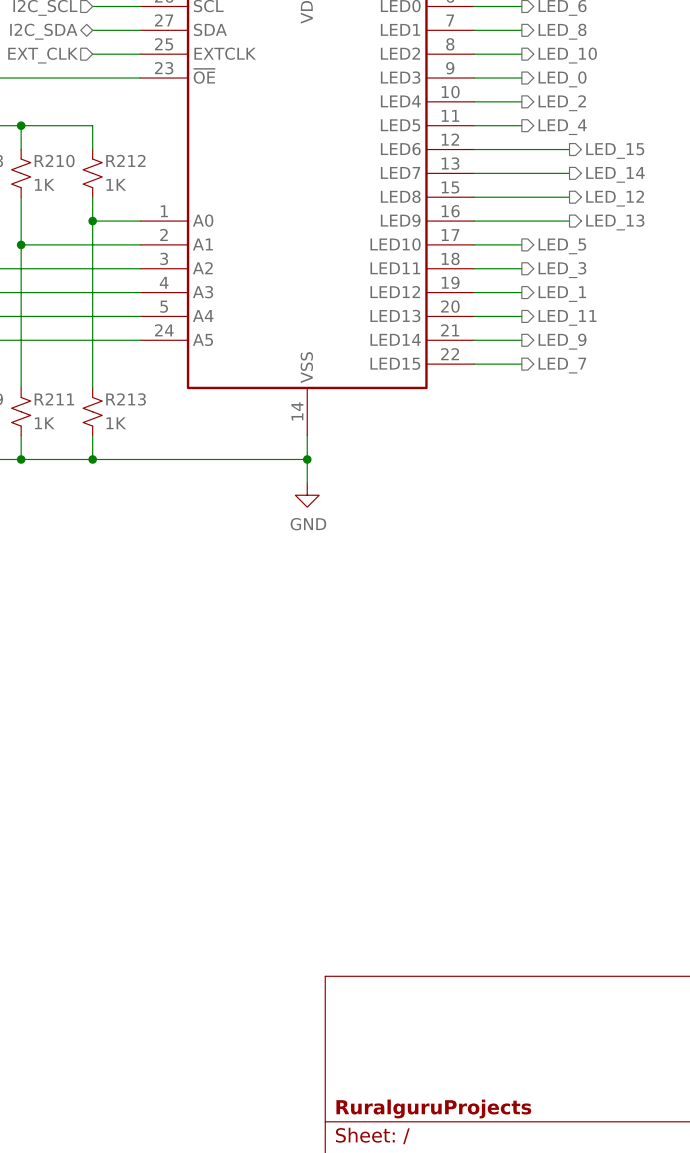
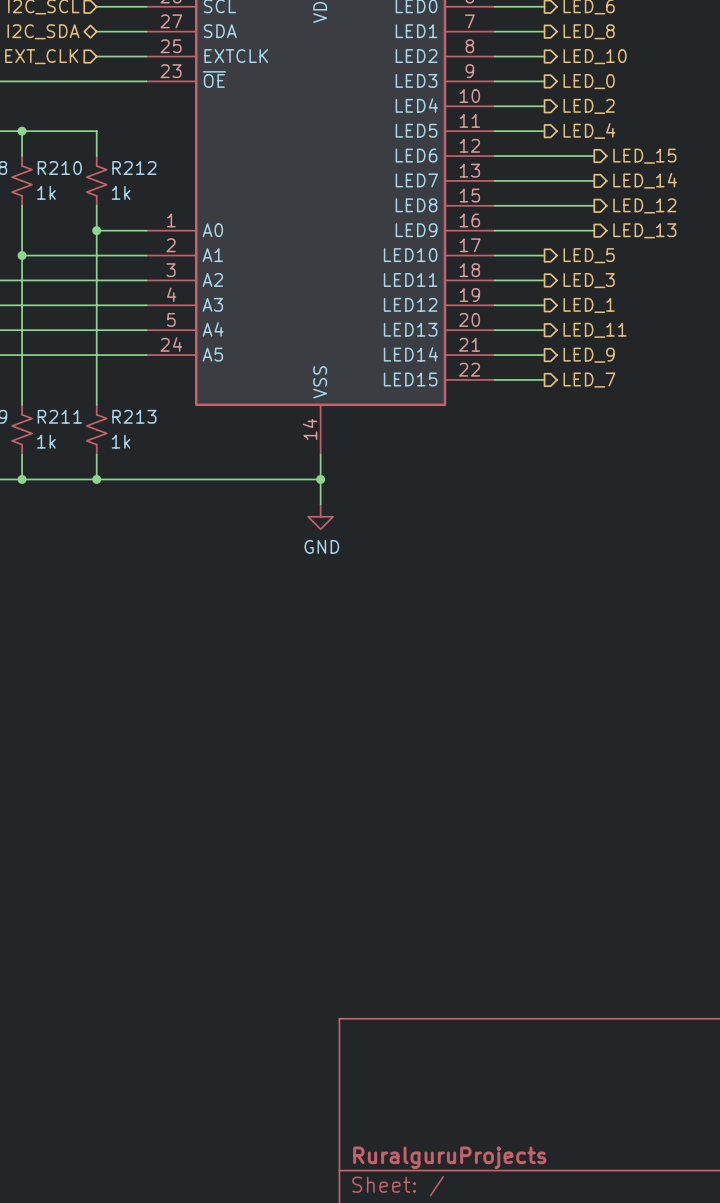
R210 value: 1K (44, 184) -> 1k (46, 192)
R212 value: 1K (116, 184) -> 1k (121, 192)
R211 value: 1K (44, 423) -> 1k (46, 441)
R213 value: 1K (116, 423) -> 1k (121, 441)

